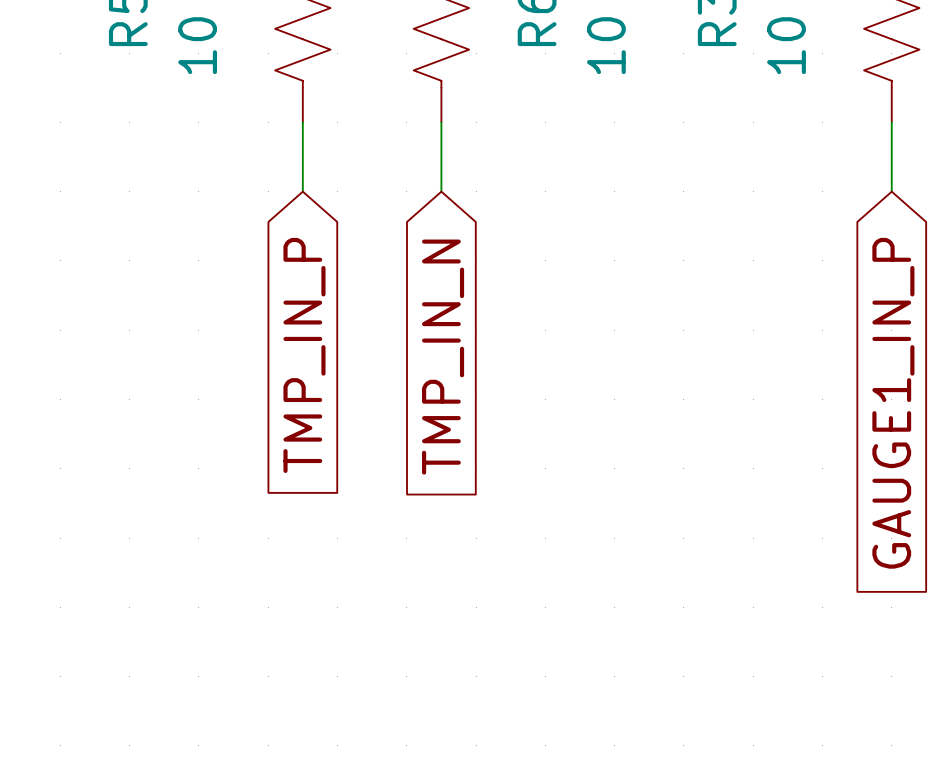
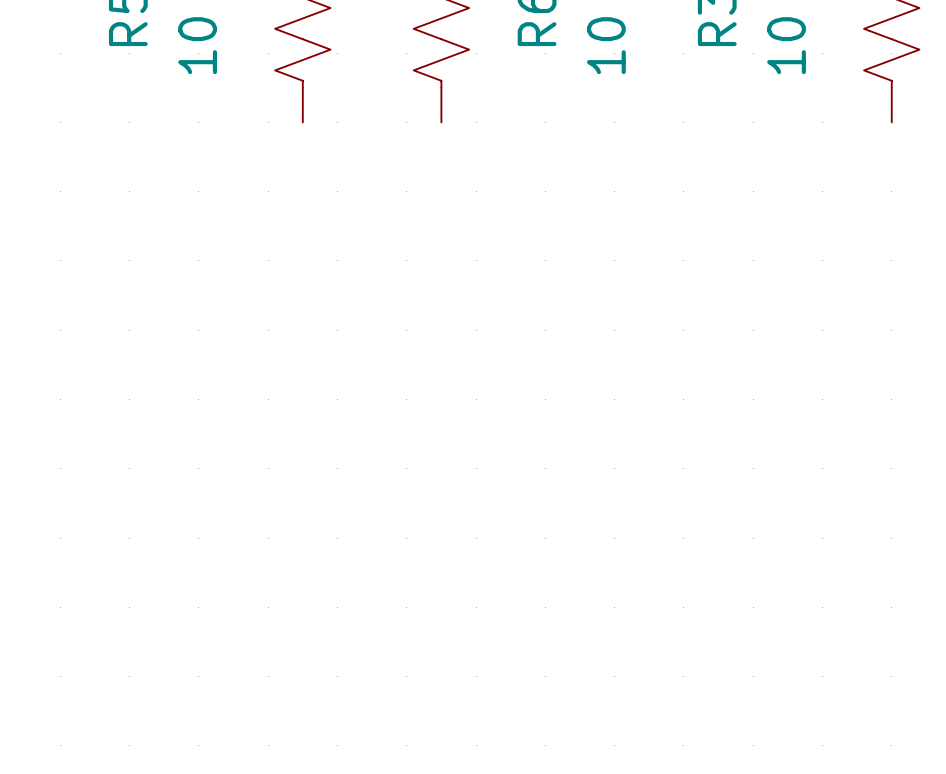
wire: (302, 122) (302, 191) -> none
wire: (441, 122) (441, 191) -> none
wire: (891, 122) (891, 191) -> none
global label: TMP_IN_P (304, 355) -> none
global label: TMP_IN_N (443, 357) -> none
global label: GAUGE1_IN_P (893, 403) -> none

